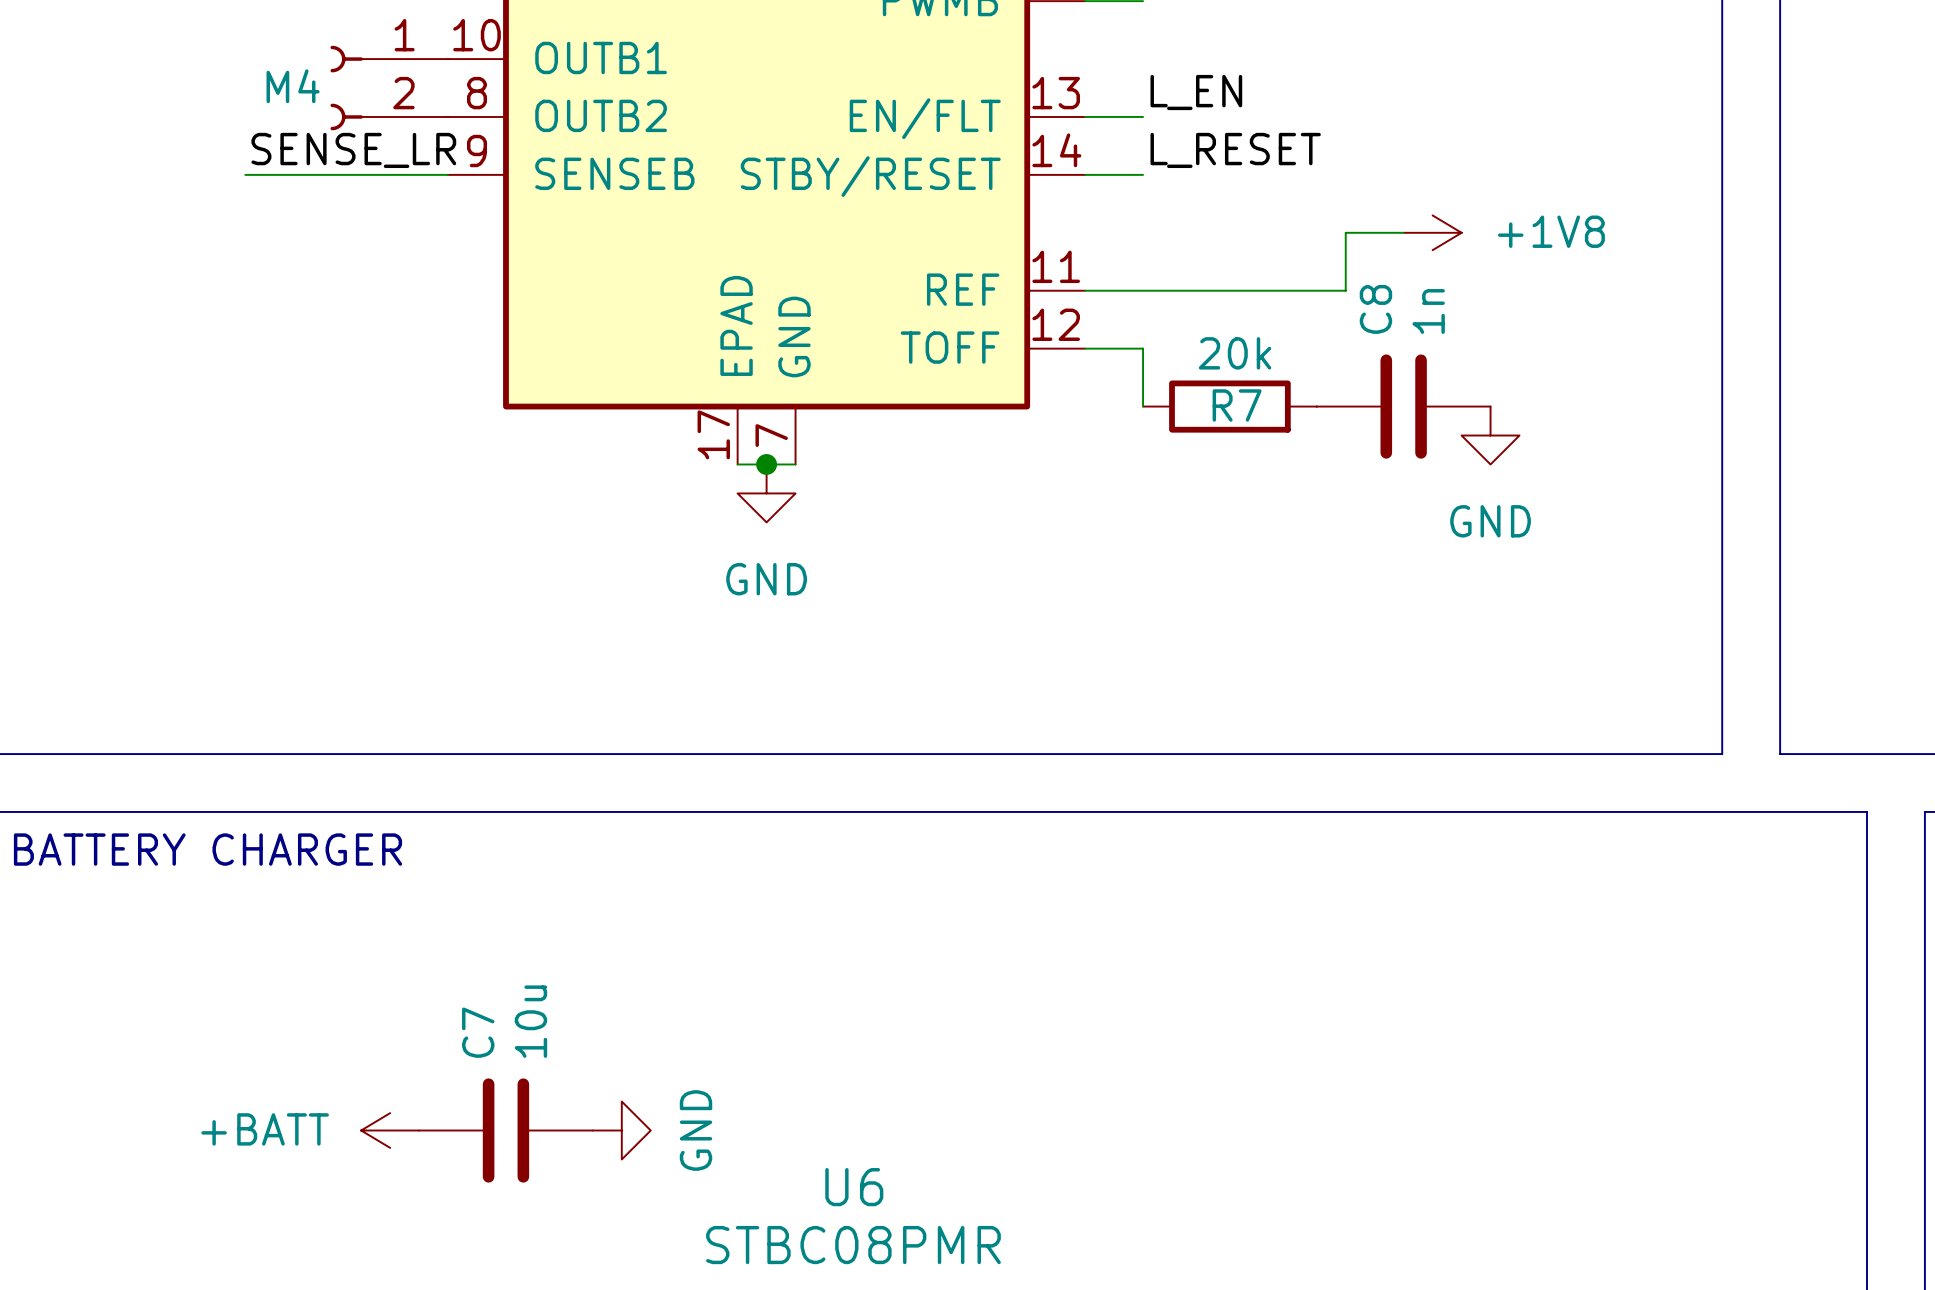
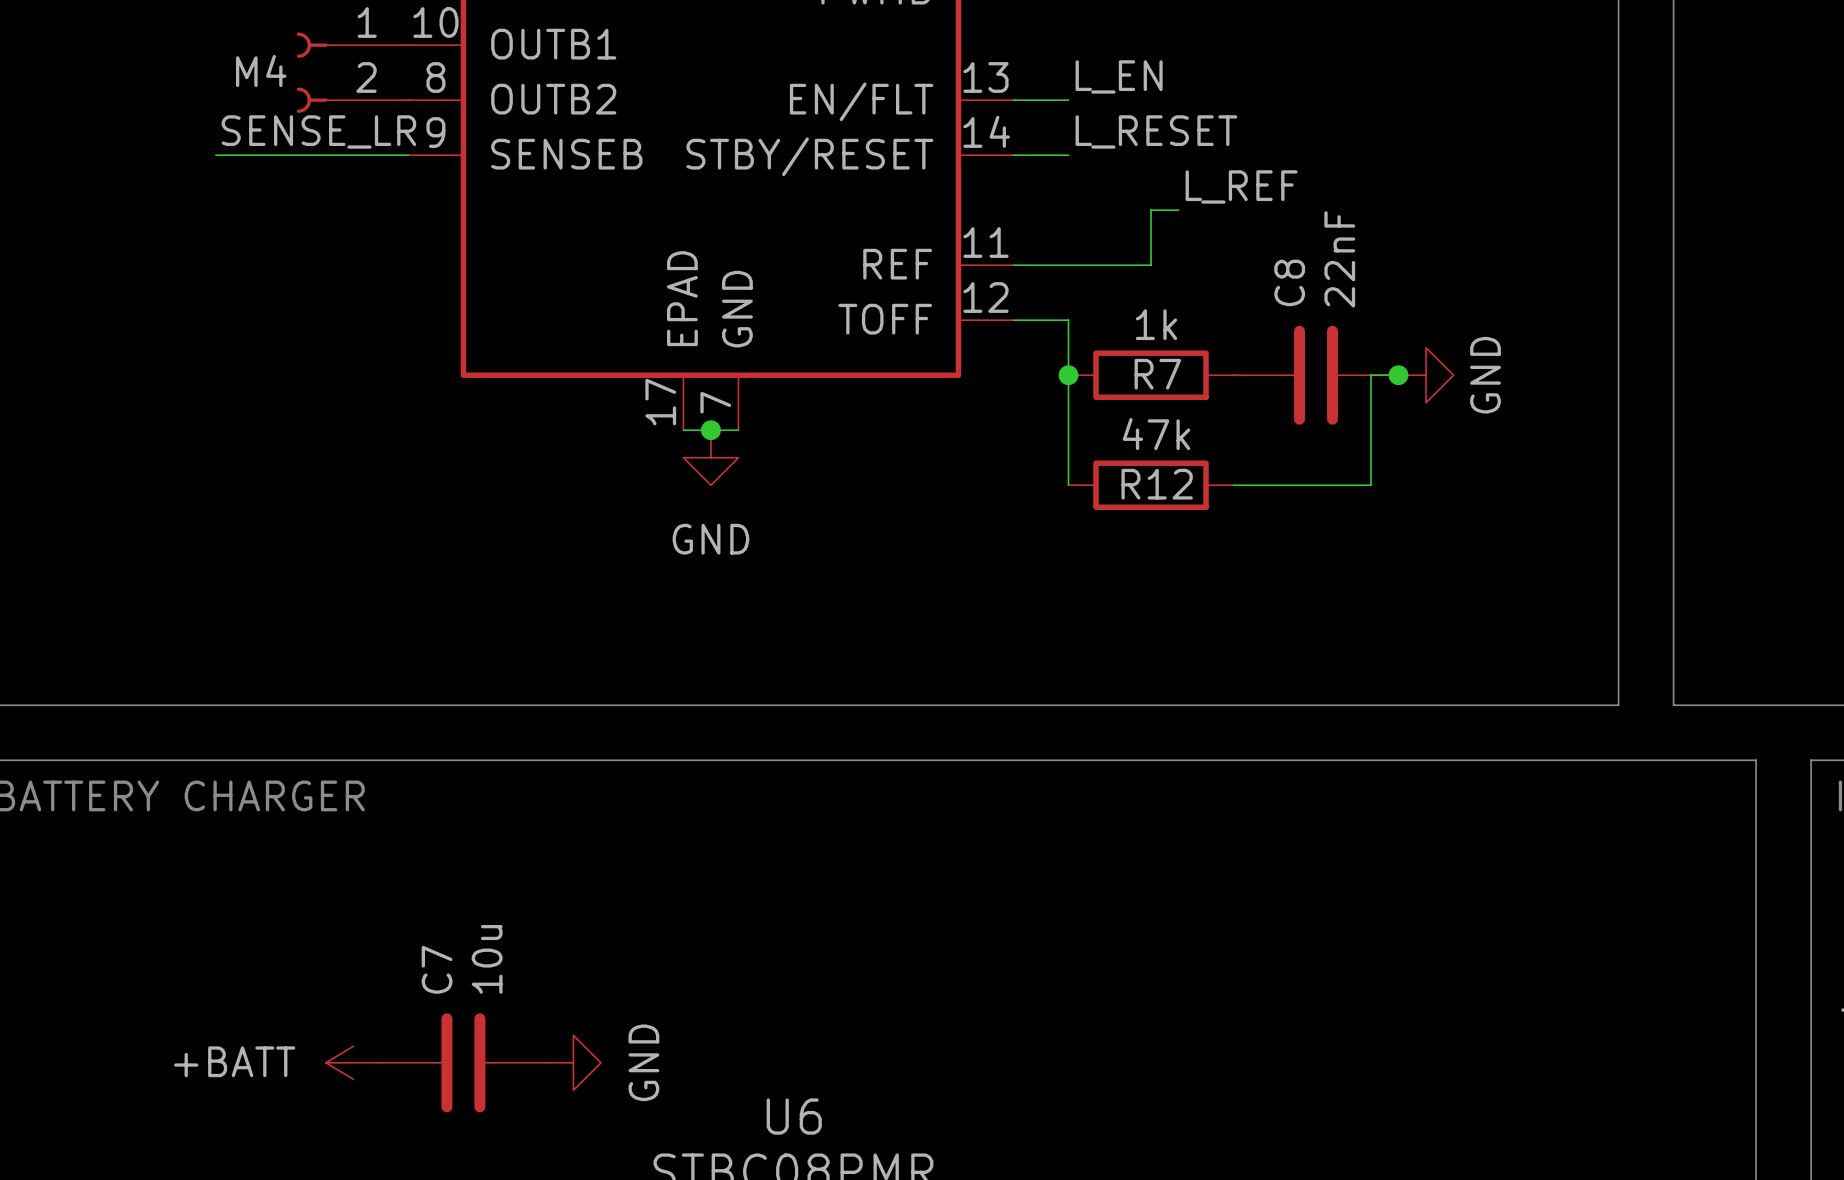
label: none -> L_REF (1241, 186)
wire: (1403, 232) (1345, 232) (1345, 290) (1229, 290) -> (1178, 210) (1151, 210) (1151, 265)
power symbol: +1V8 (1432, 232) -> none
C8 value: 1n (1428, 311) -> 22nF (1339, 259)
R7 value: 20k (1235, 353) -> 1k (1156, 324)
wire: none -> (1068, 375) (1068, 485)
junction: none -> (1068, 375)
wire: none -> (1398, 375) (1371, 375) (1371, 485) (1233, 485)
junction: none -> (1398, 375)
power symbol rotation: 0° (1490, 435) -> 90° counterclockwise (1426, 375)
power symbol position: GND (1490, 435) -> GND (1426, 375)
R12: none -> 47k (1151, 485)

